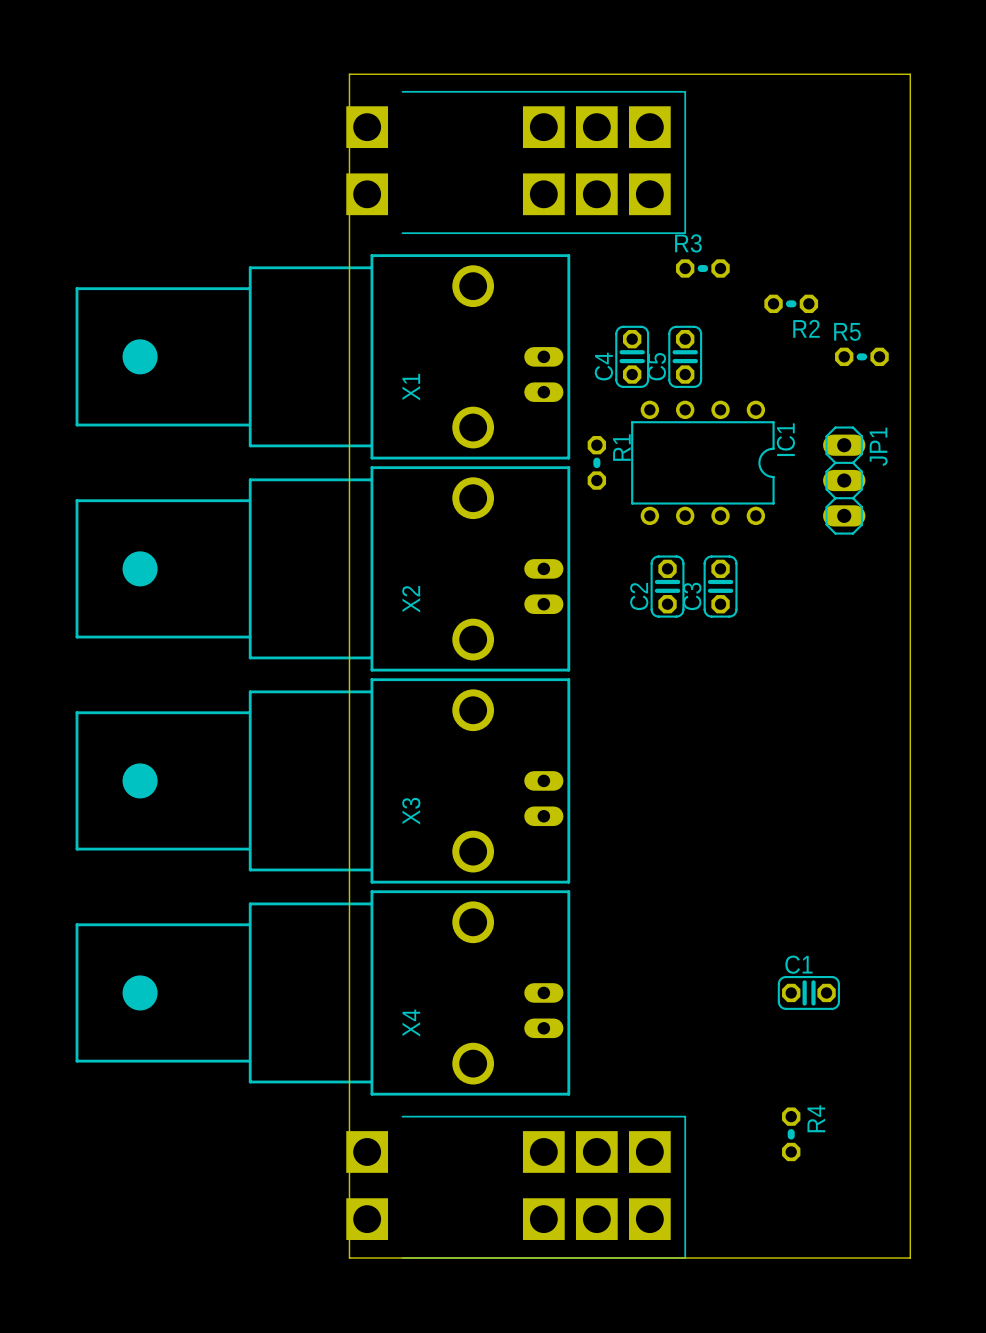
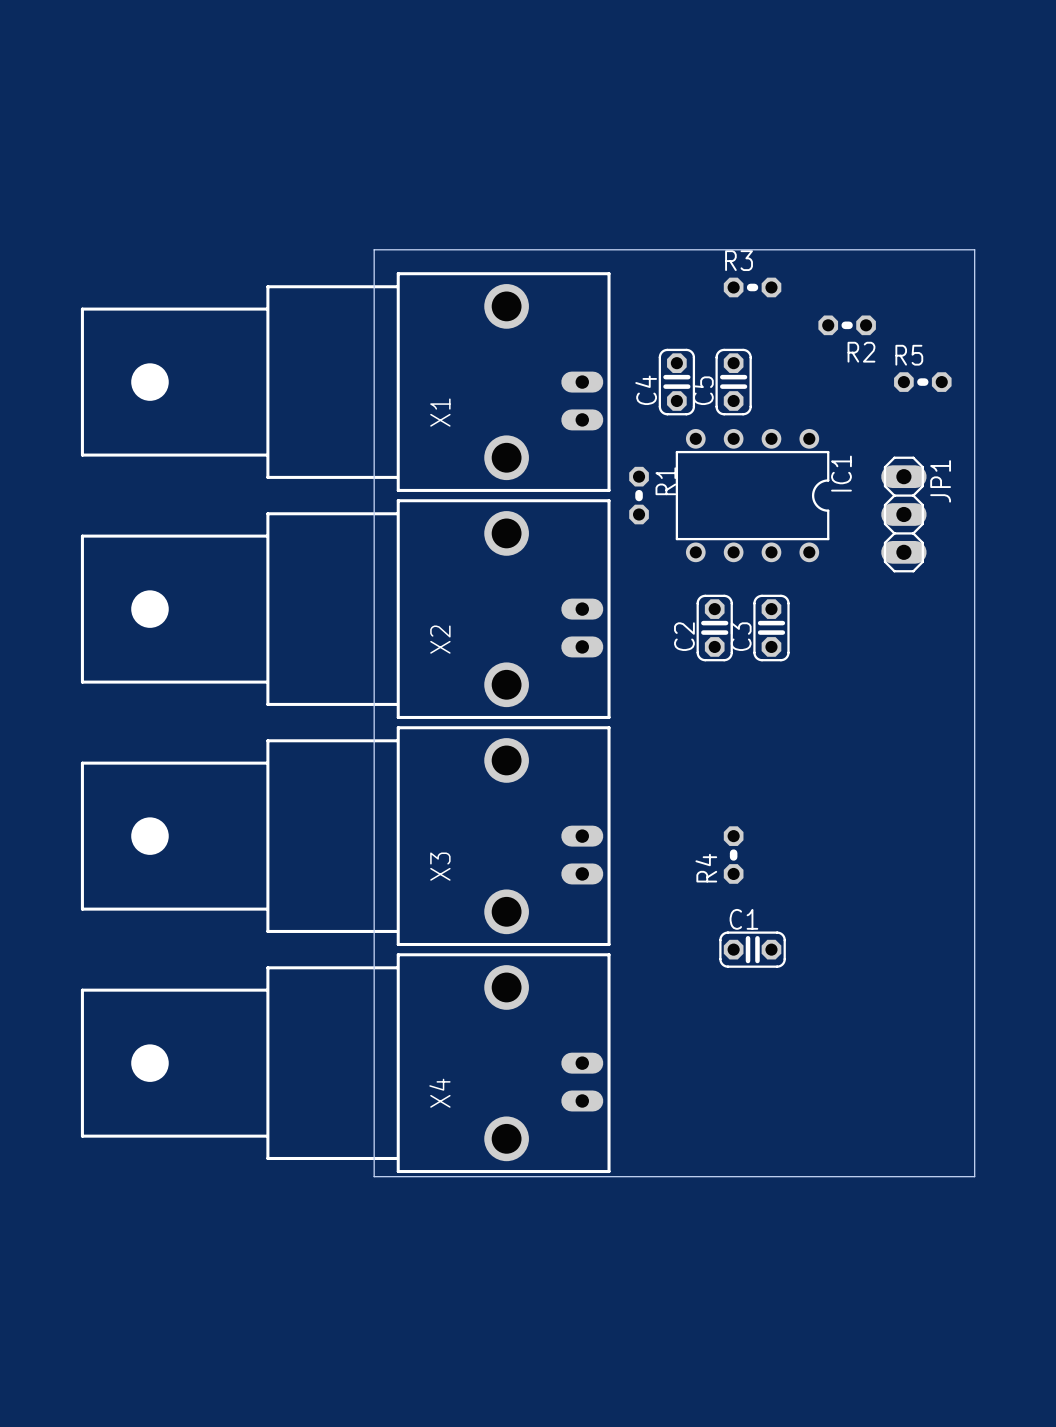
part: (516, 162) -> none
board edge: (349, 233) (349, 74) (910, 74) (910, 233) -> (374, 249) (974, 249)
C1 position: (808, 992) -> (752, 949)
board edge: (349, 1098) (349, 1258) (910, 1258) (910, 1098) -> (374, 1176) (974, 1176)
R4 name position: R4 (816, 1118) -> R4 (706, 868)
R4 position: (791, 1134) -> (733, 855)
part: (516, 1187) -> none

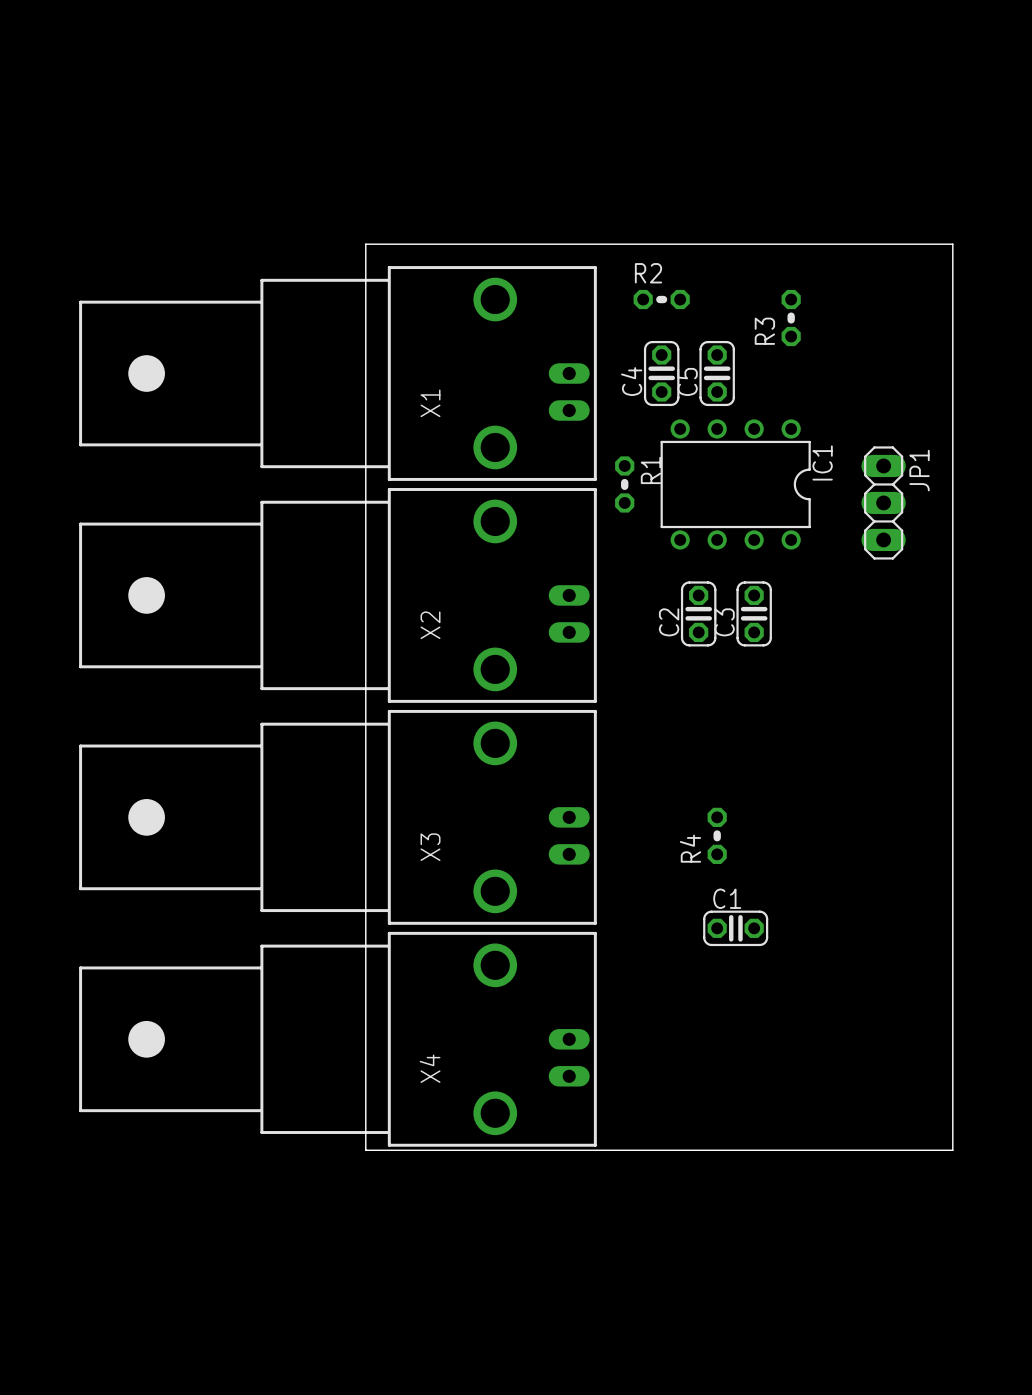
R3 name position: R3 (739, 260) -> R3 (764, 331)
R3 rotation: 0° (752, 287) -> 90° clockwise (791, 318)
R3 position: (752, 287) -> (791, 318)
R2 position: (847, 325) -> (661, 299)
R2 name position: R2 (861, 352) -> R2 (648, 273)
R5: (922, 382) -> none

